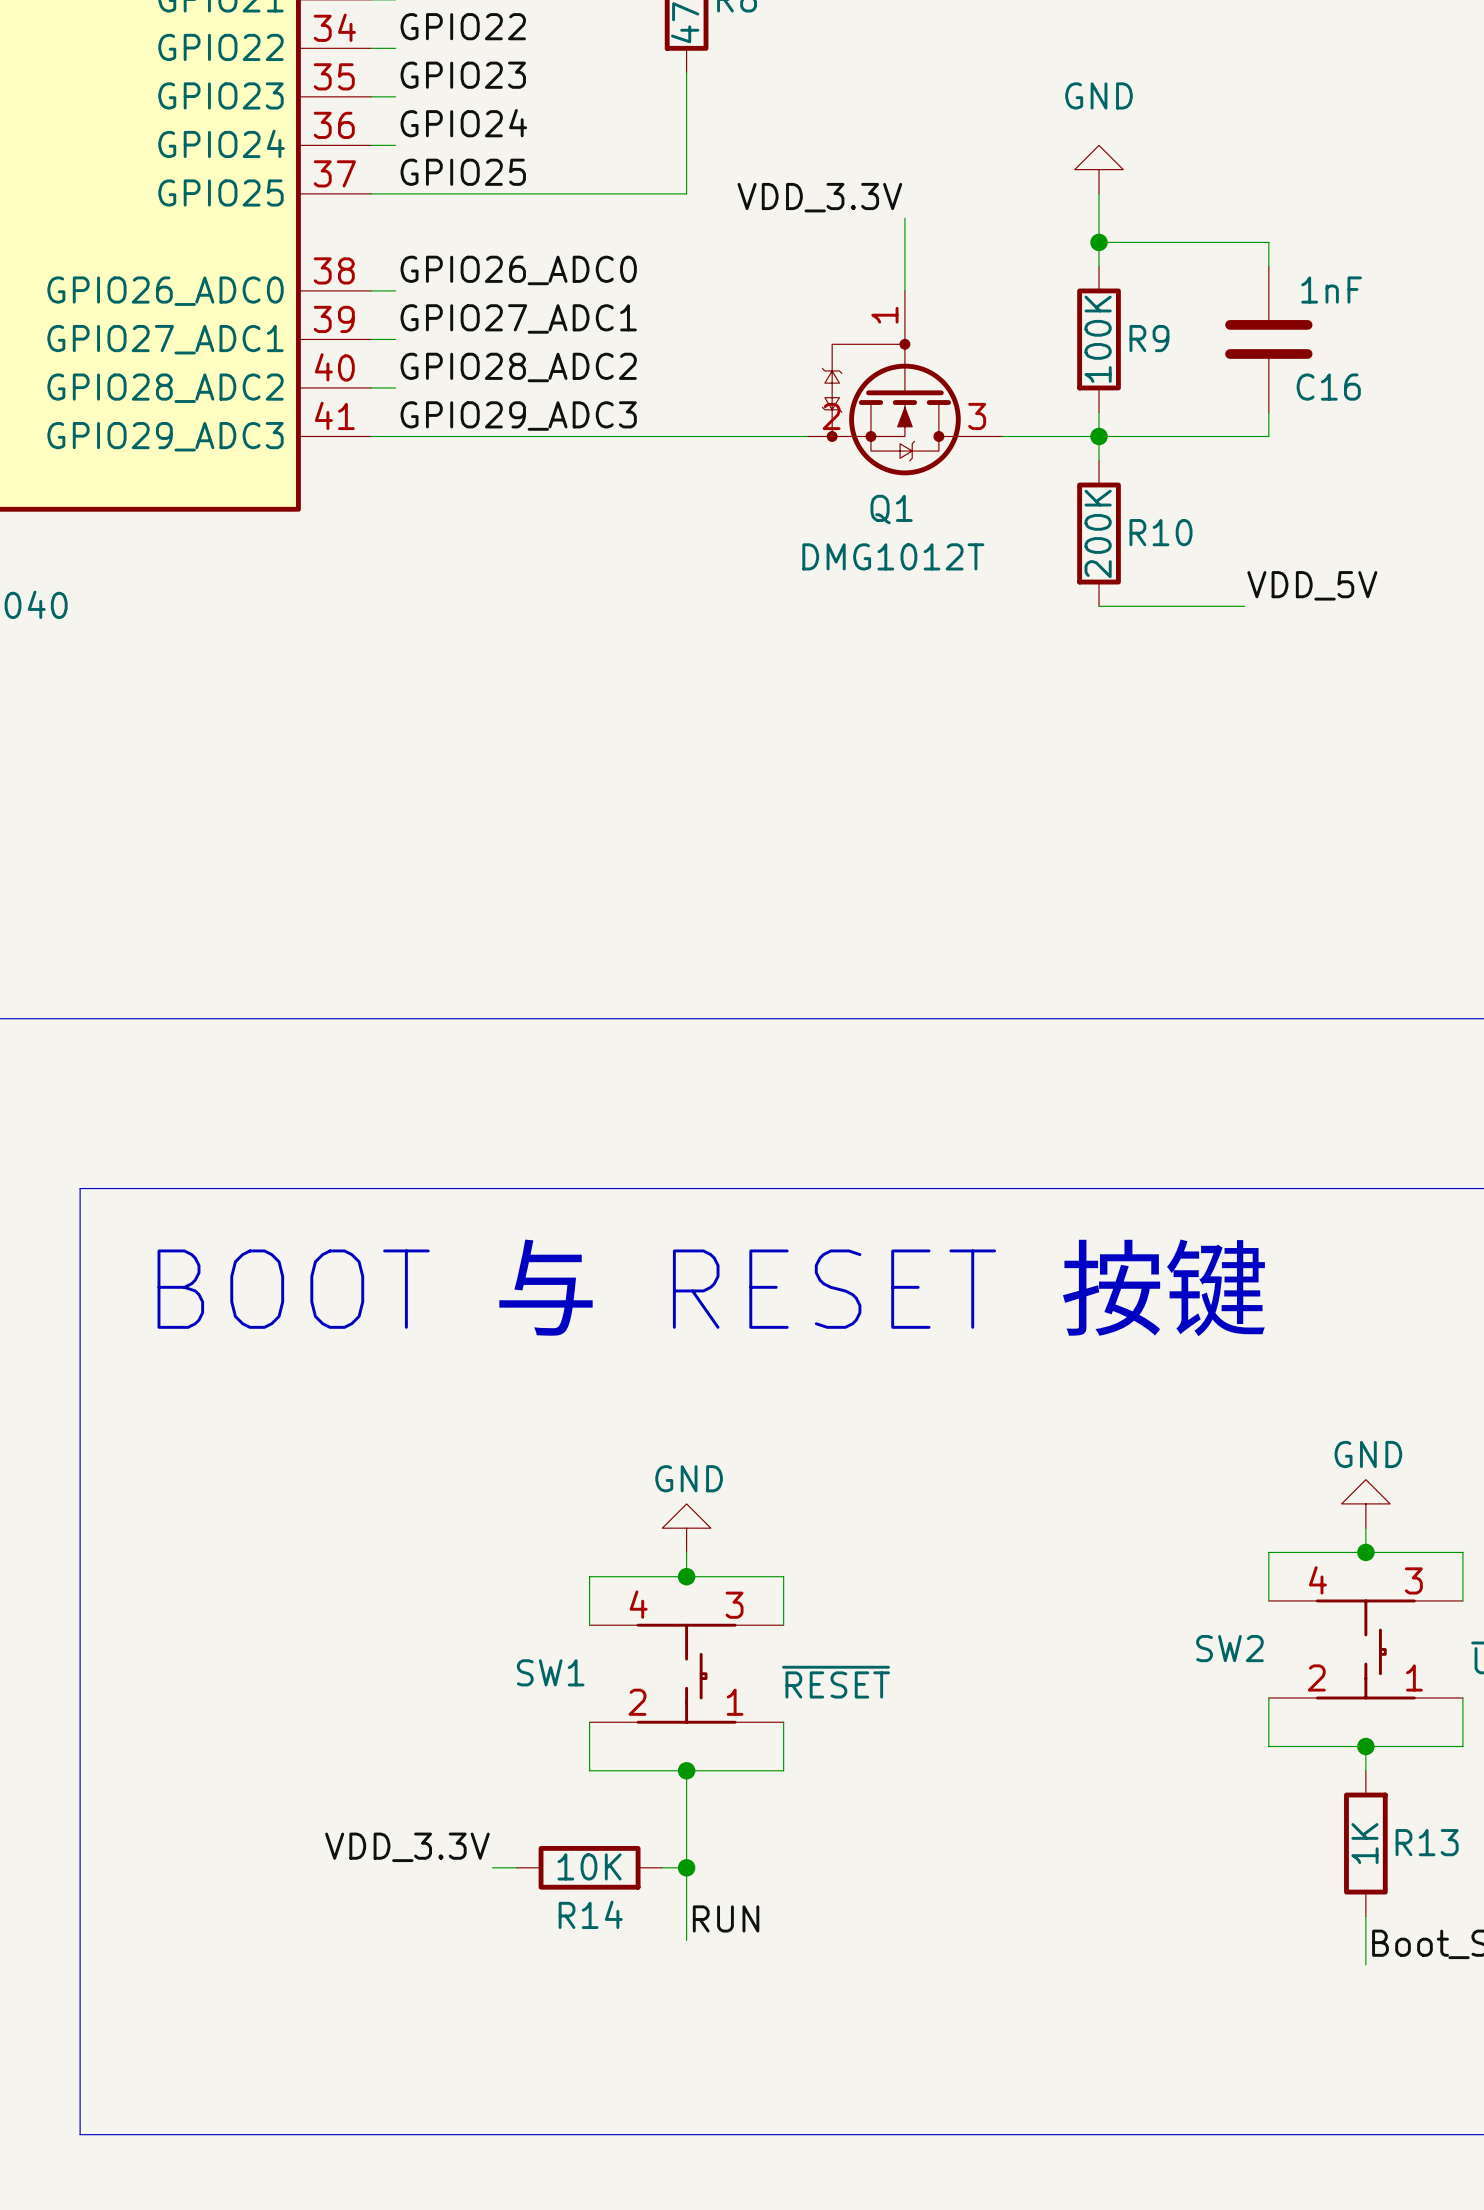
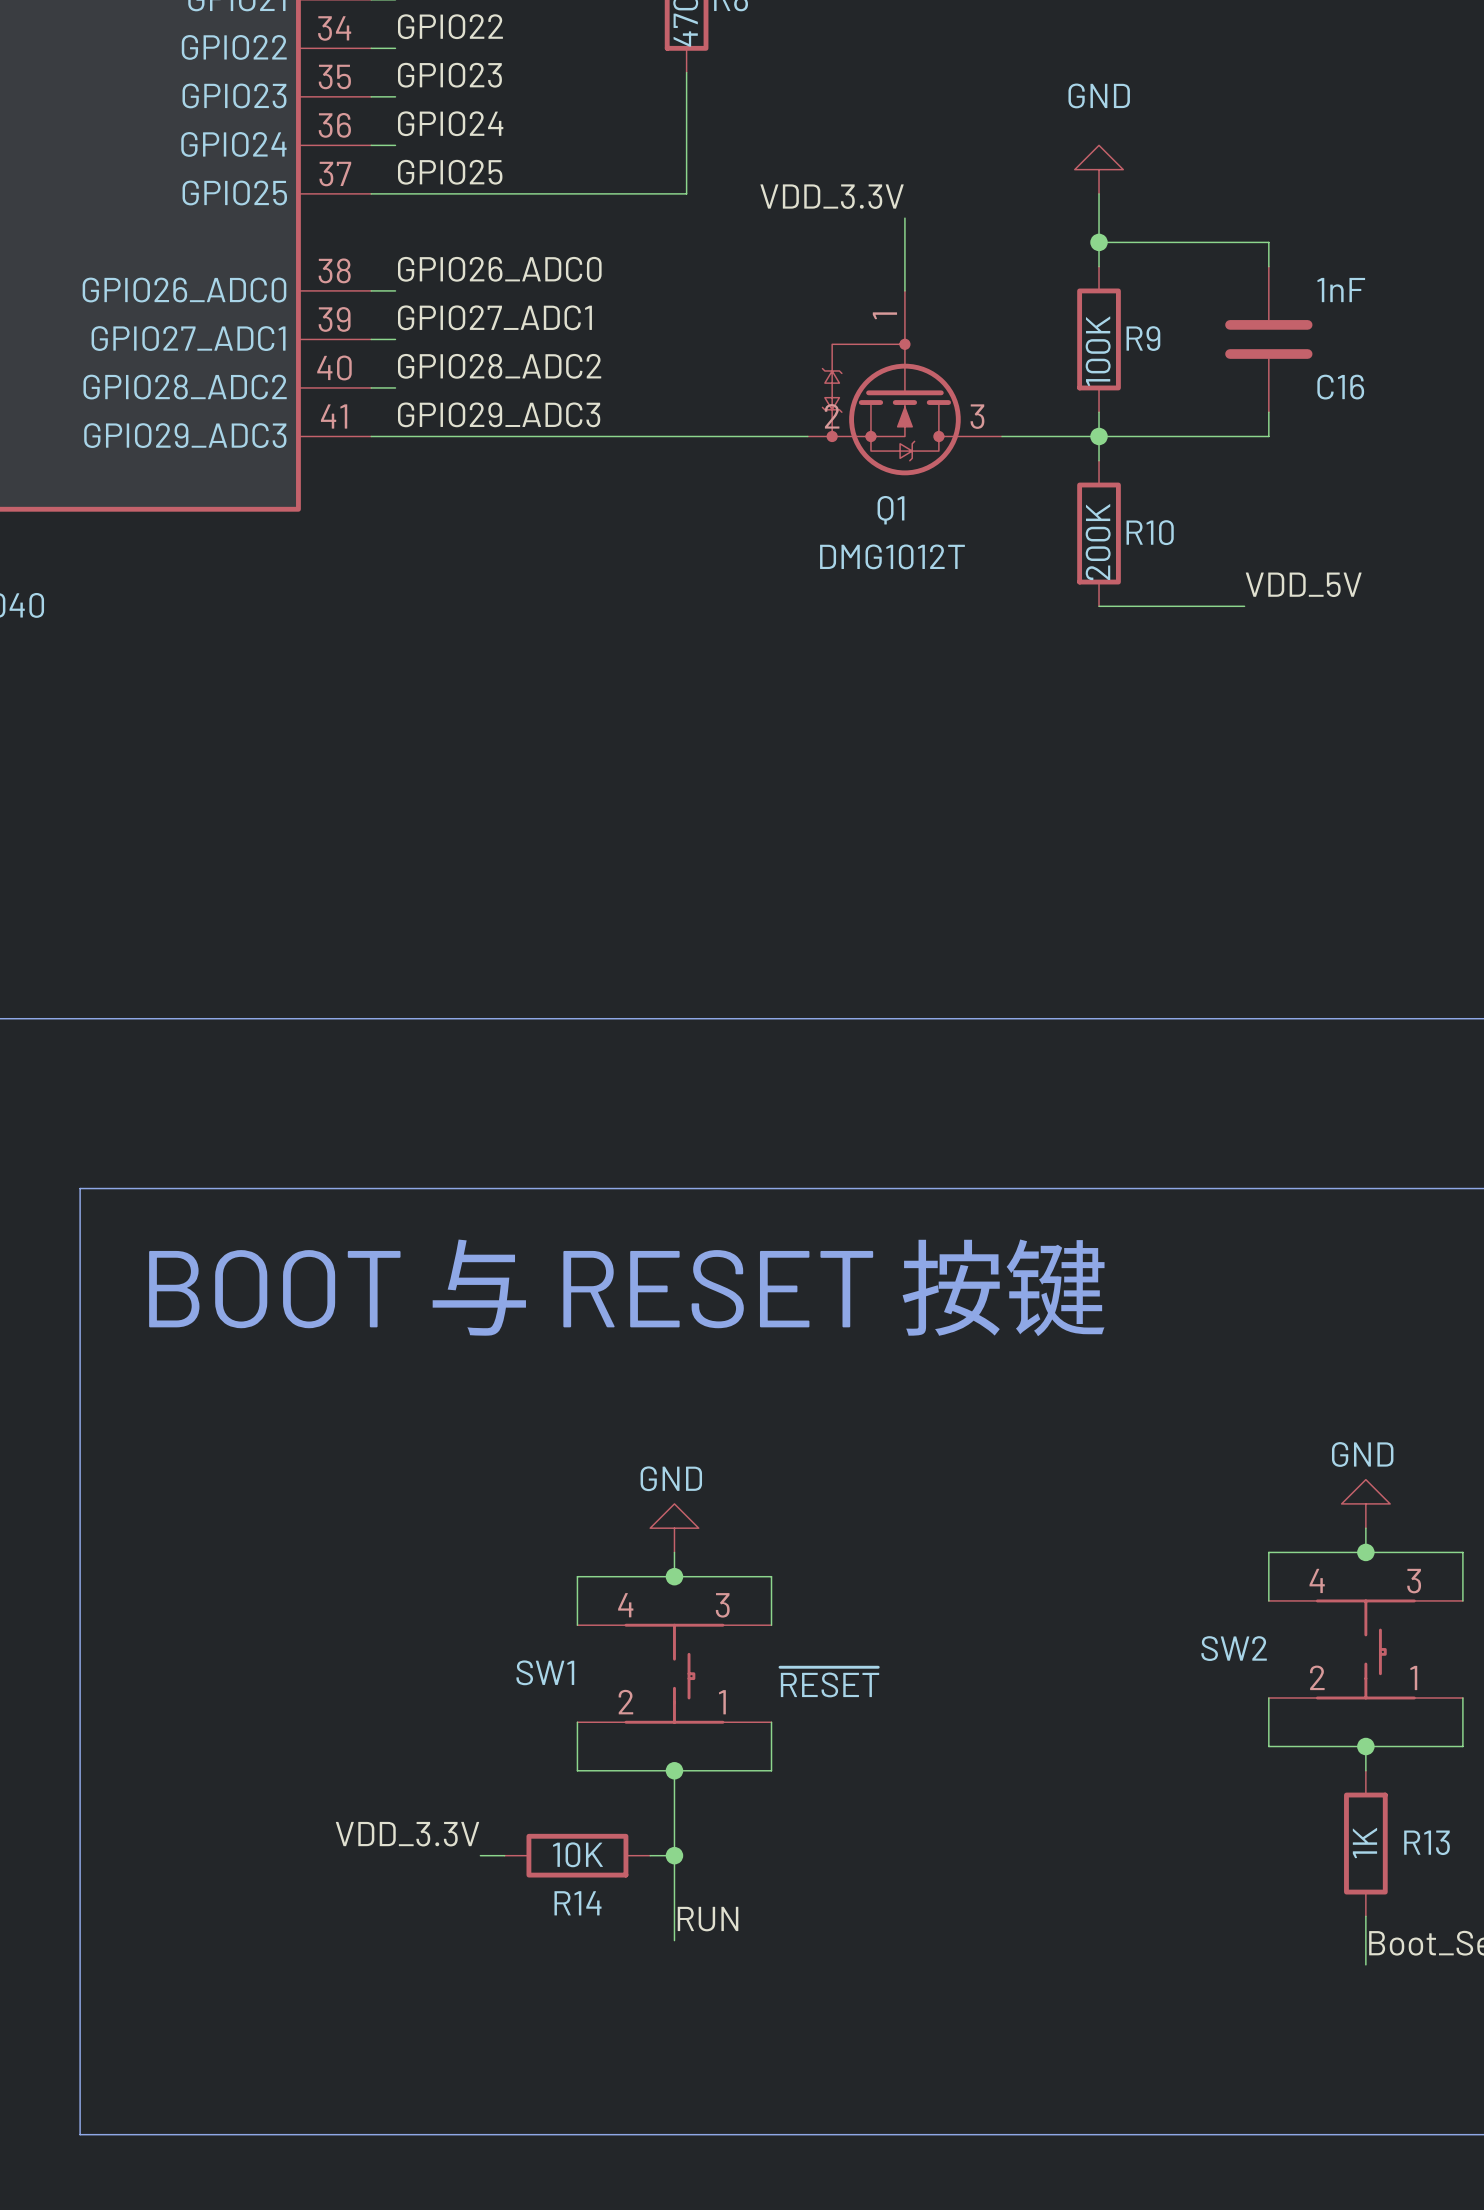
power symbol position: GND (686, 1528) -> GND (674, 1528)
wire: (686, 1552) (686, 1576) -> (674, 1552) (674, 1576)
wire: (589, 1576) (589, 1625) -> (589, 1576) (577, 1576) (577, 1625)
junction position: (686, 1576) -> (674, 1576)
wire: (771, 1576) (783, 1576) (783, 1625) -> (771, 1576) (771, 1625)
SW1 position: (686, 1673) -> (674, 1673)
wire: (589, 1722) (589, 1770) -> (577, 1722) (577, 1770) (589, 1770)
wire: (783, 1722) (783, 1770) (771, 1770) -> (771, 1722) (771, 1770)
wire: (686, 1770) (686, 1940) -> (674, 1770) (674, 1940)
junction position: (686, 1770) -> (674, 1770)
label position: VDD_3.3V (407, 1847) -> VDD_3.3V (407, 1834)
wire: (492, 1867) (516, 1867) -> (480, 1855) (504, 1855)
R14 position: (589, 1867) -> (577, 1855)
wire: (662, 1867) (686, 1867) -> (650, 1855) (674, 1855)
junction position: (686, 1867) -> (674, 1855)
label position: RUN (726, 1918) -> RUN (708, 1919)

